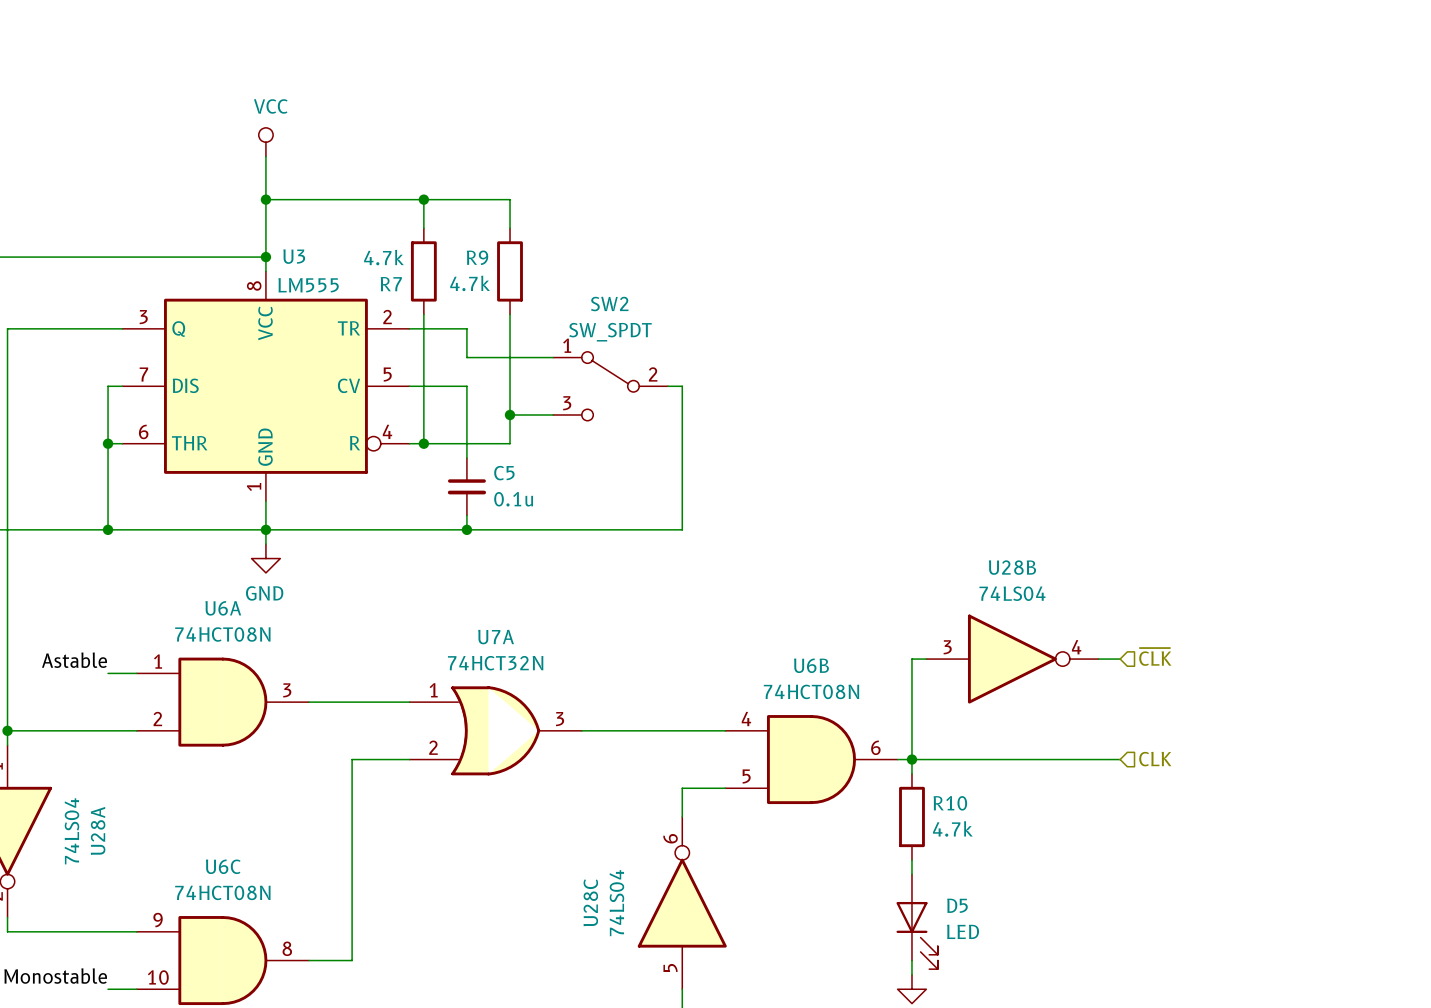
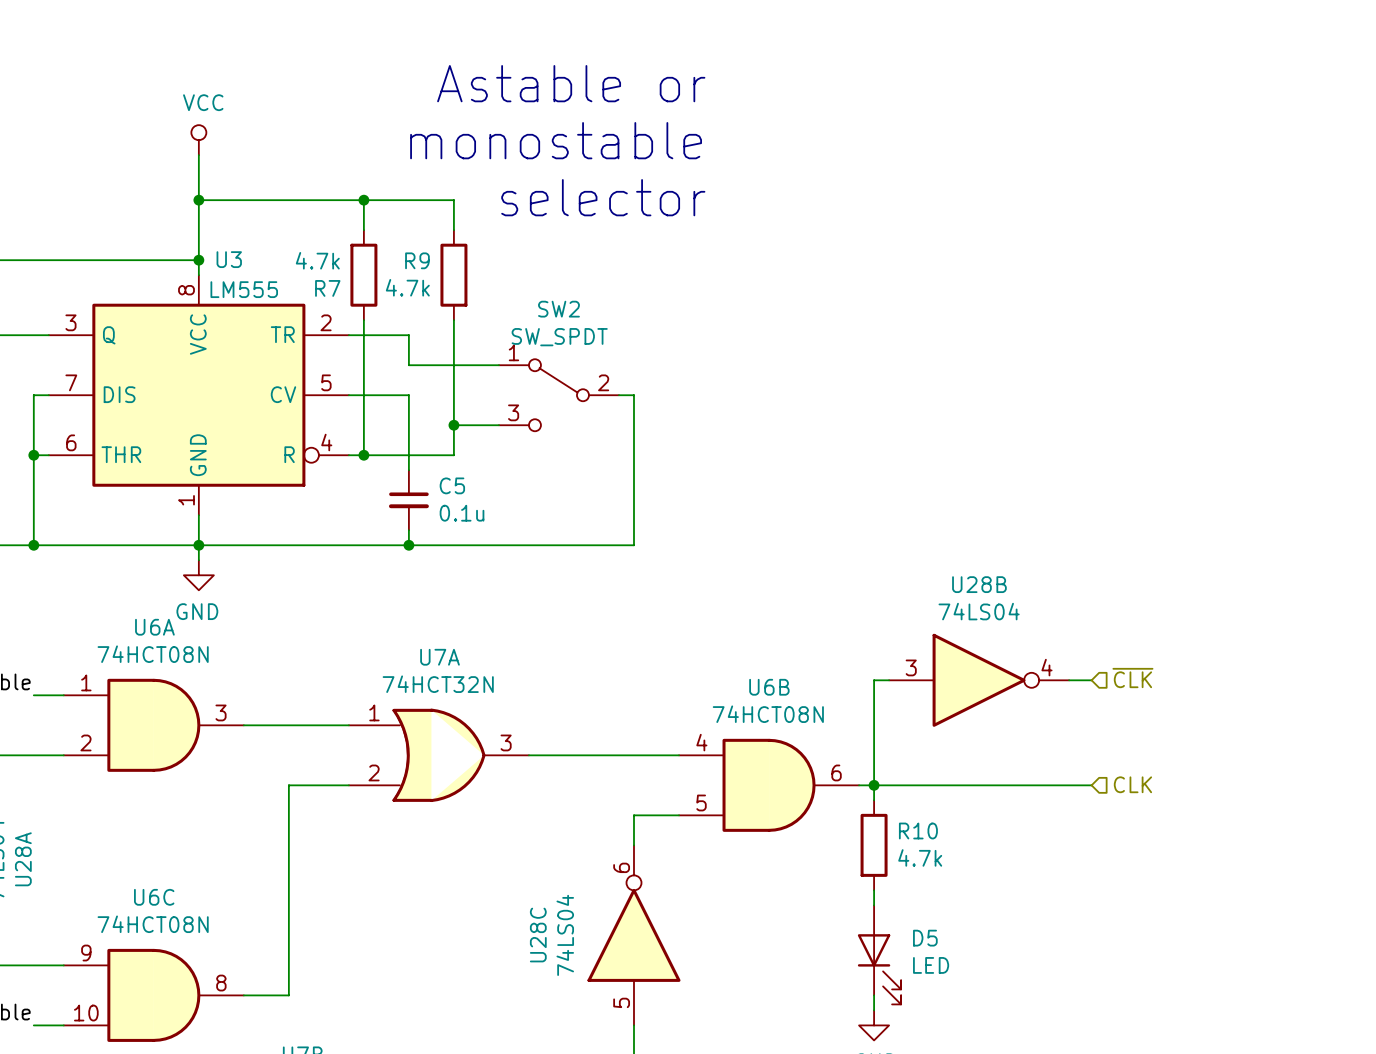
text: none -> Astable or (571, 83)
text: none -> monostable (556, 140)
text: none -> selector (603, 197)

